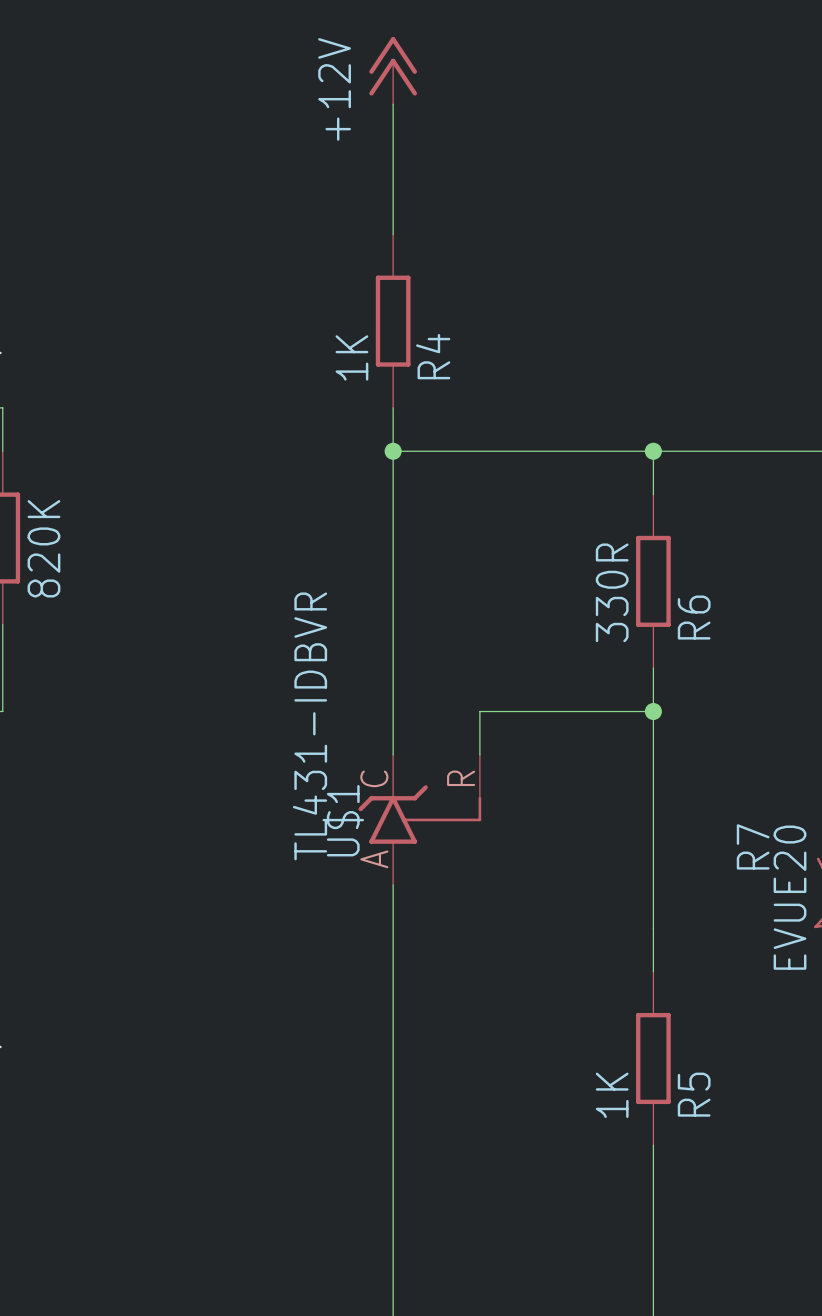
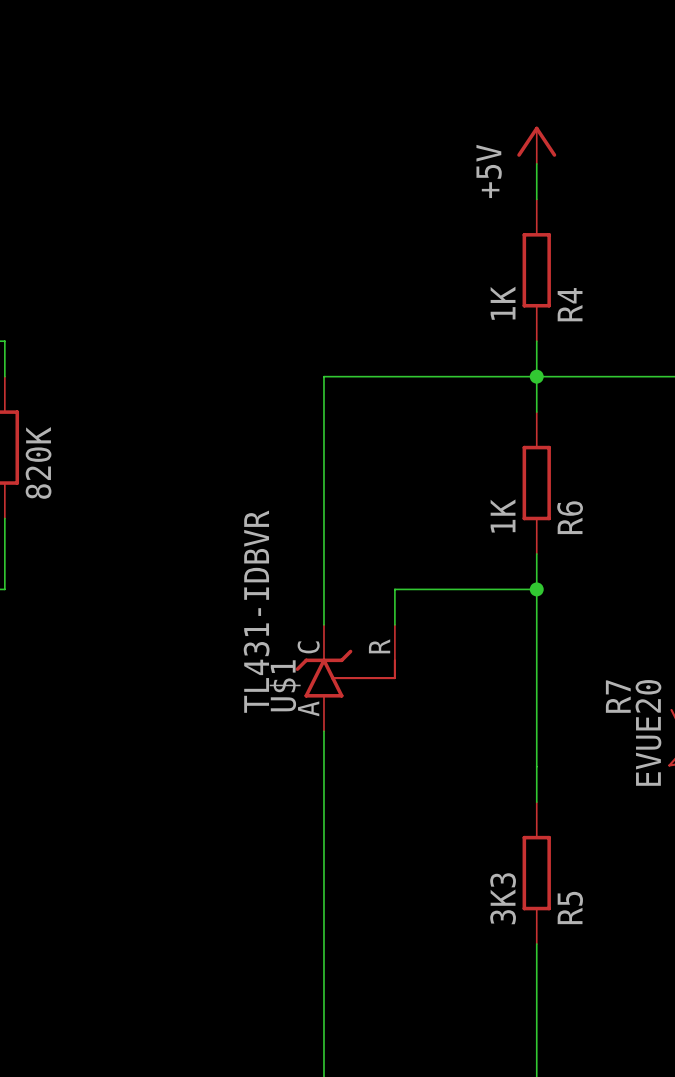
power symbol: +12V (393, 70) -> none
wire: (393, 104) (393, 234) -> none
power symbol: none -> +5V (536, 145)
wire: none -> (536, 163) (536, 199)
R4 position: (393, 321) -> (536, 270)
wire: (393, 407) (393, 451) -> (536, 341) (536, 376)
junction: (393, 451) -> none
R6 value: 330R (612, 592) -> 1K (503, 516)
R5 value: 1K (612, 1095) -> 3K3 (503, 898)

